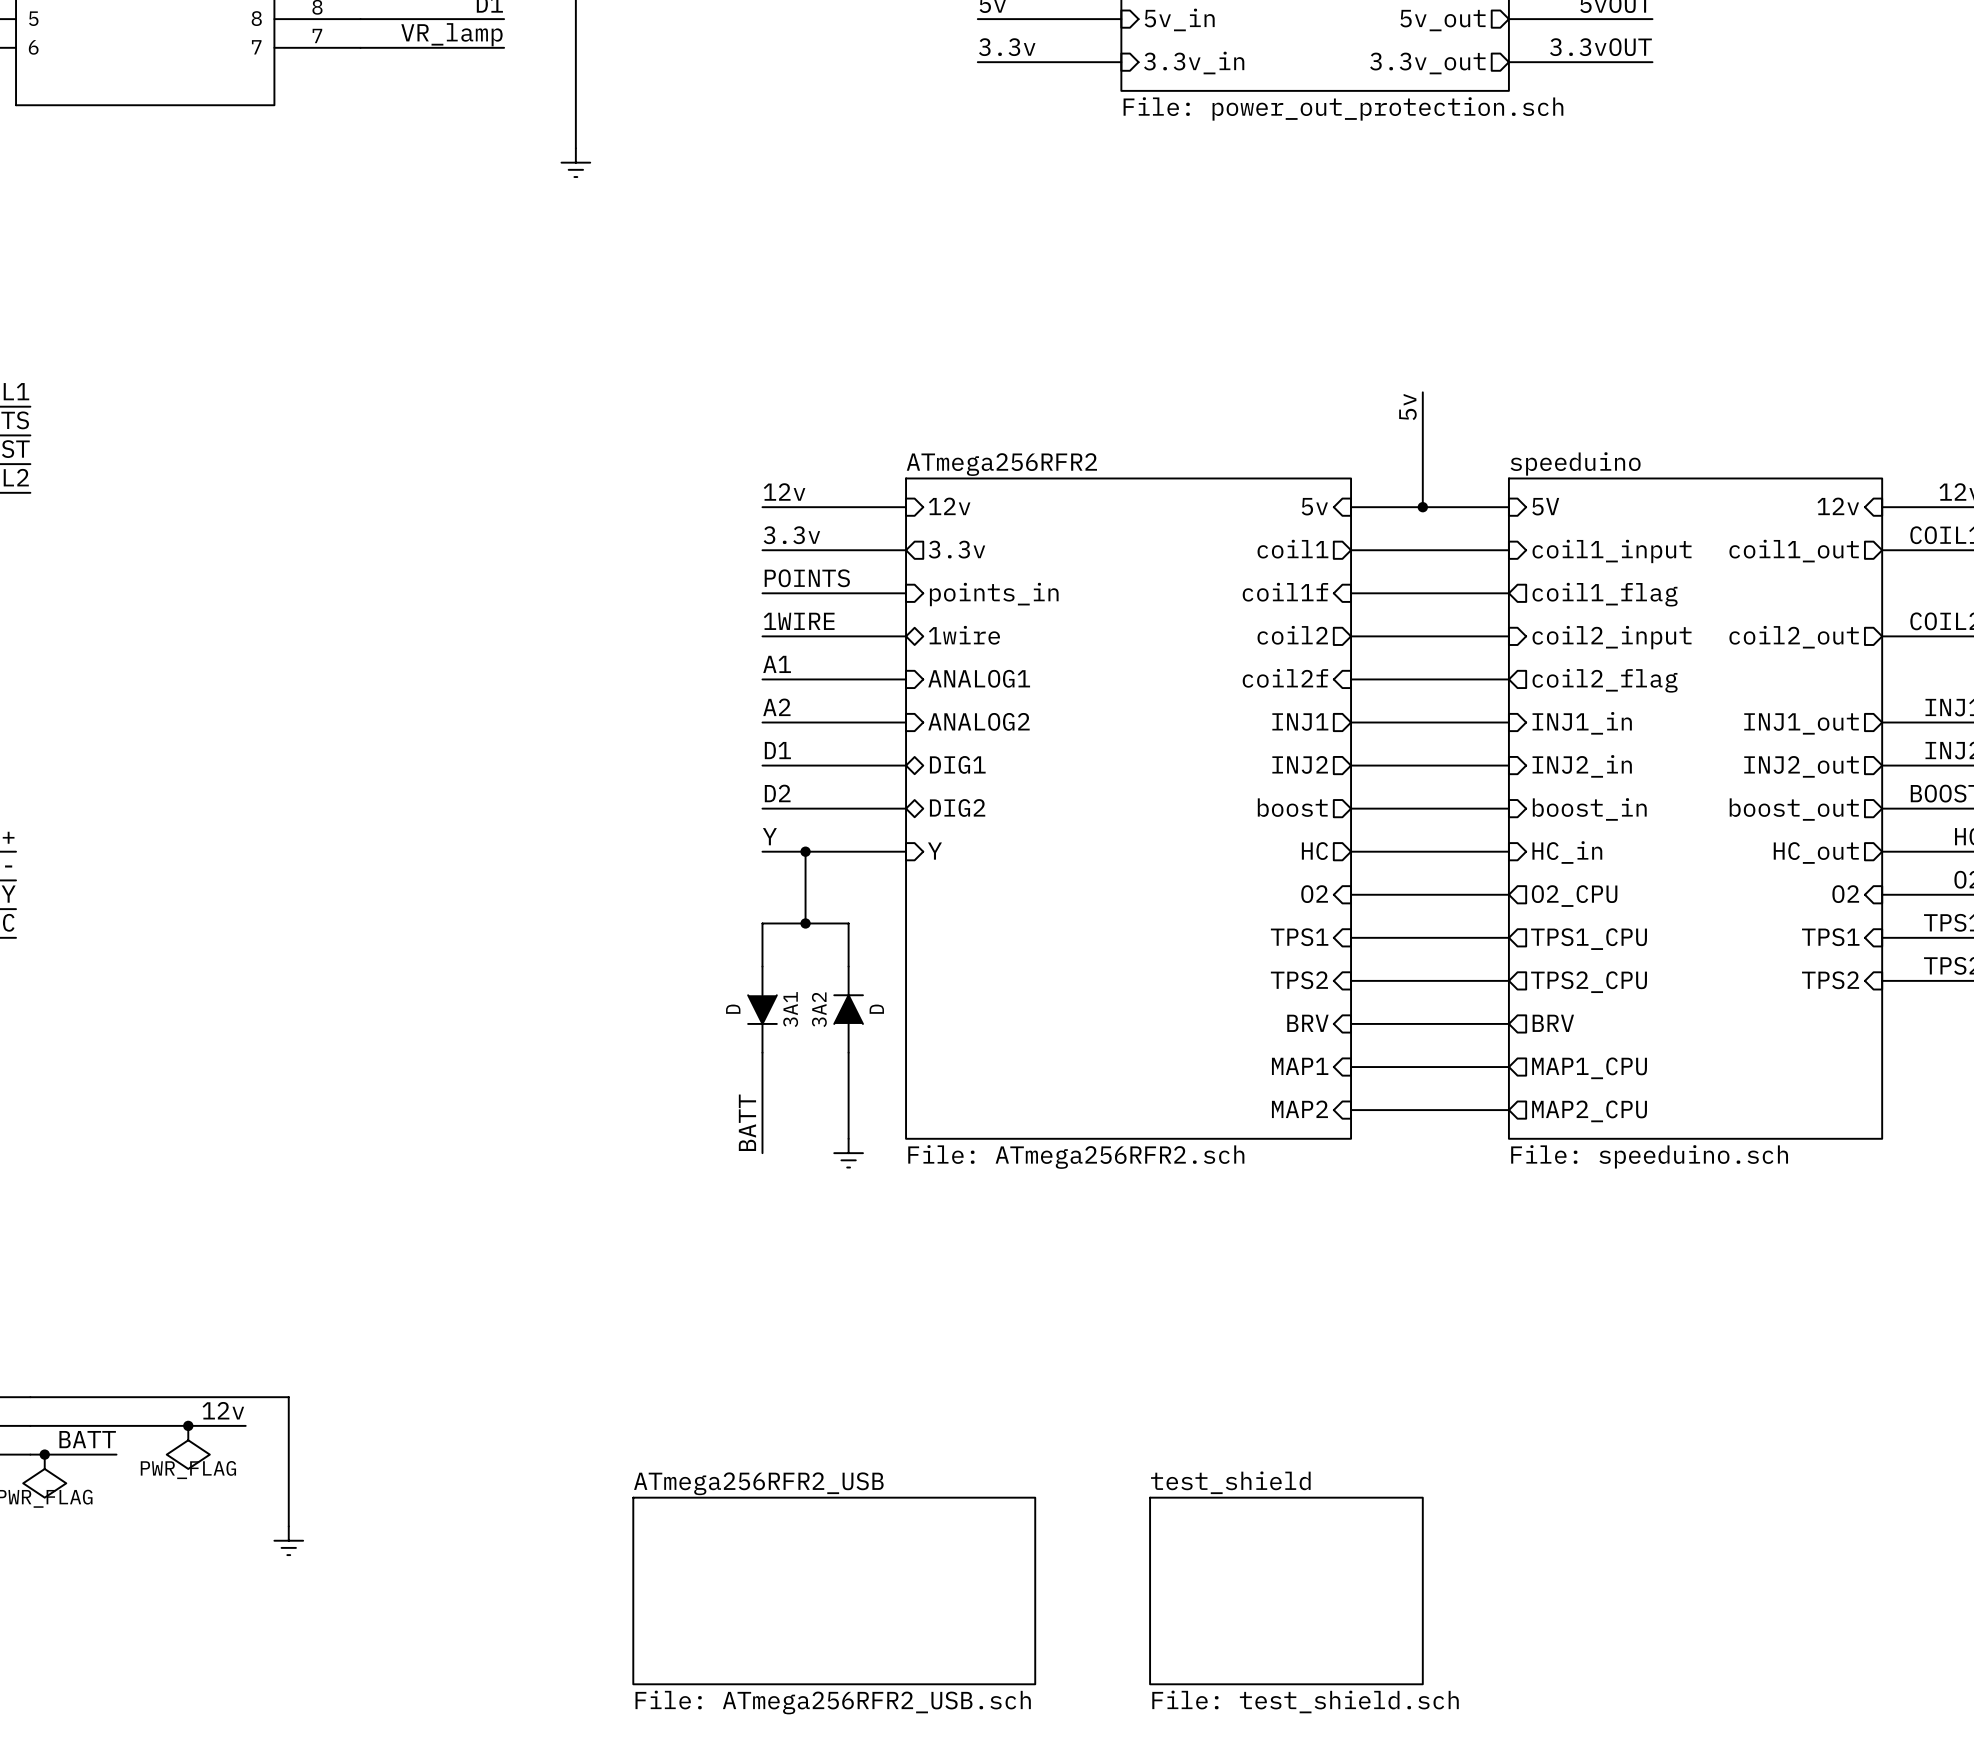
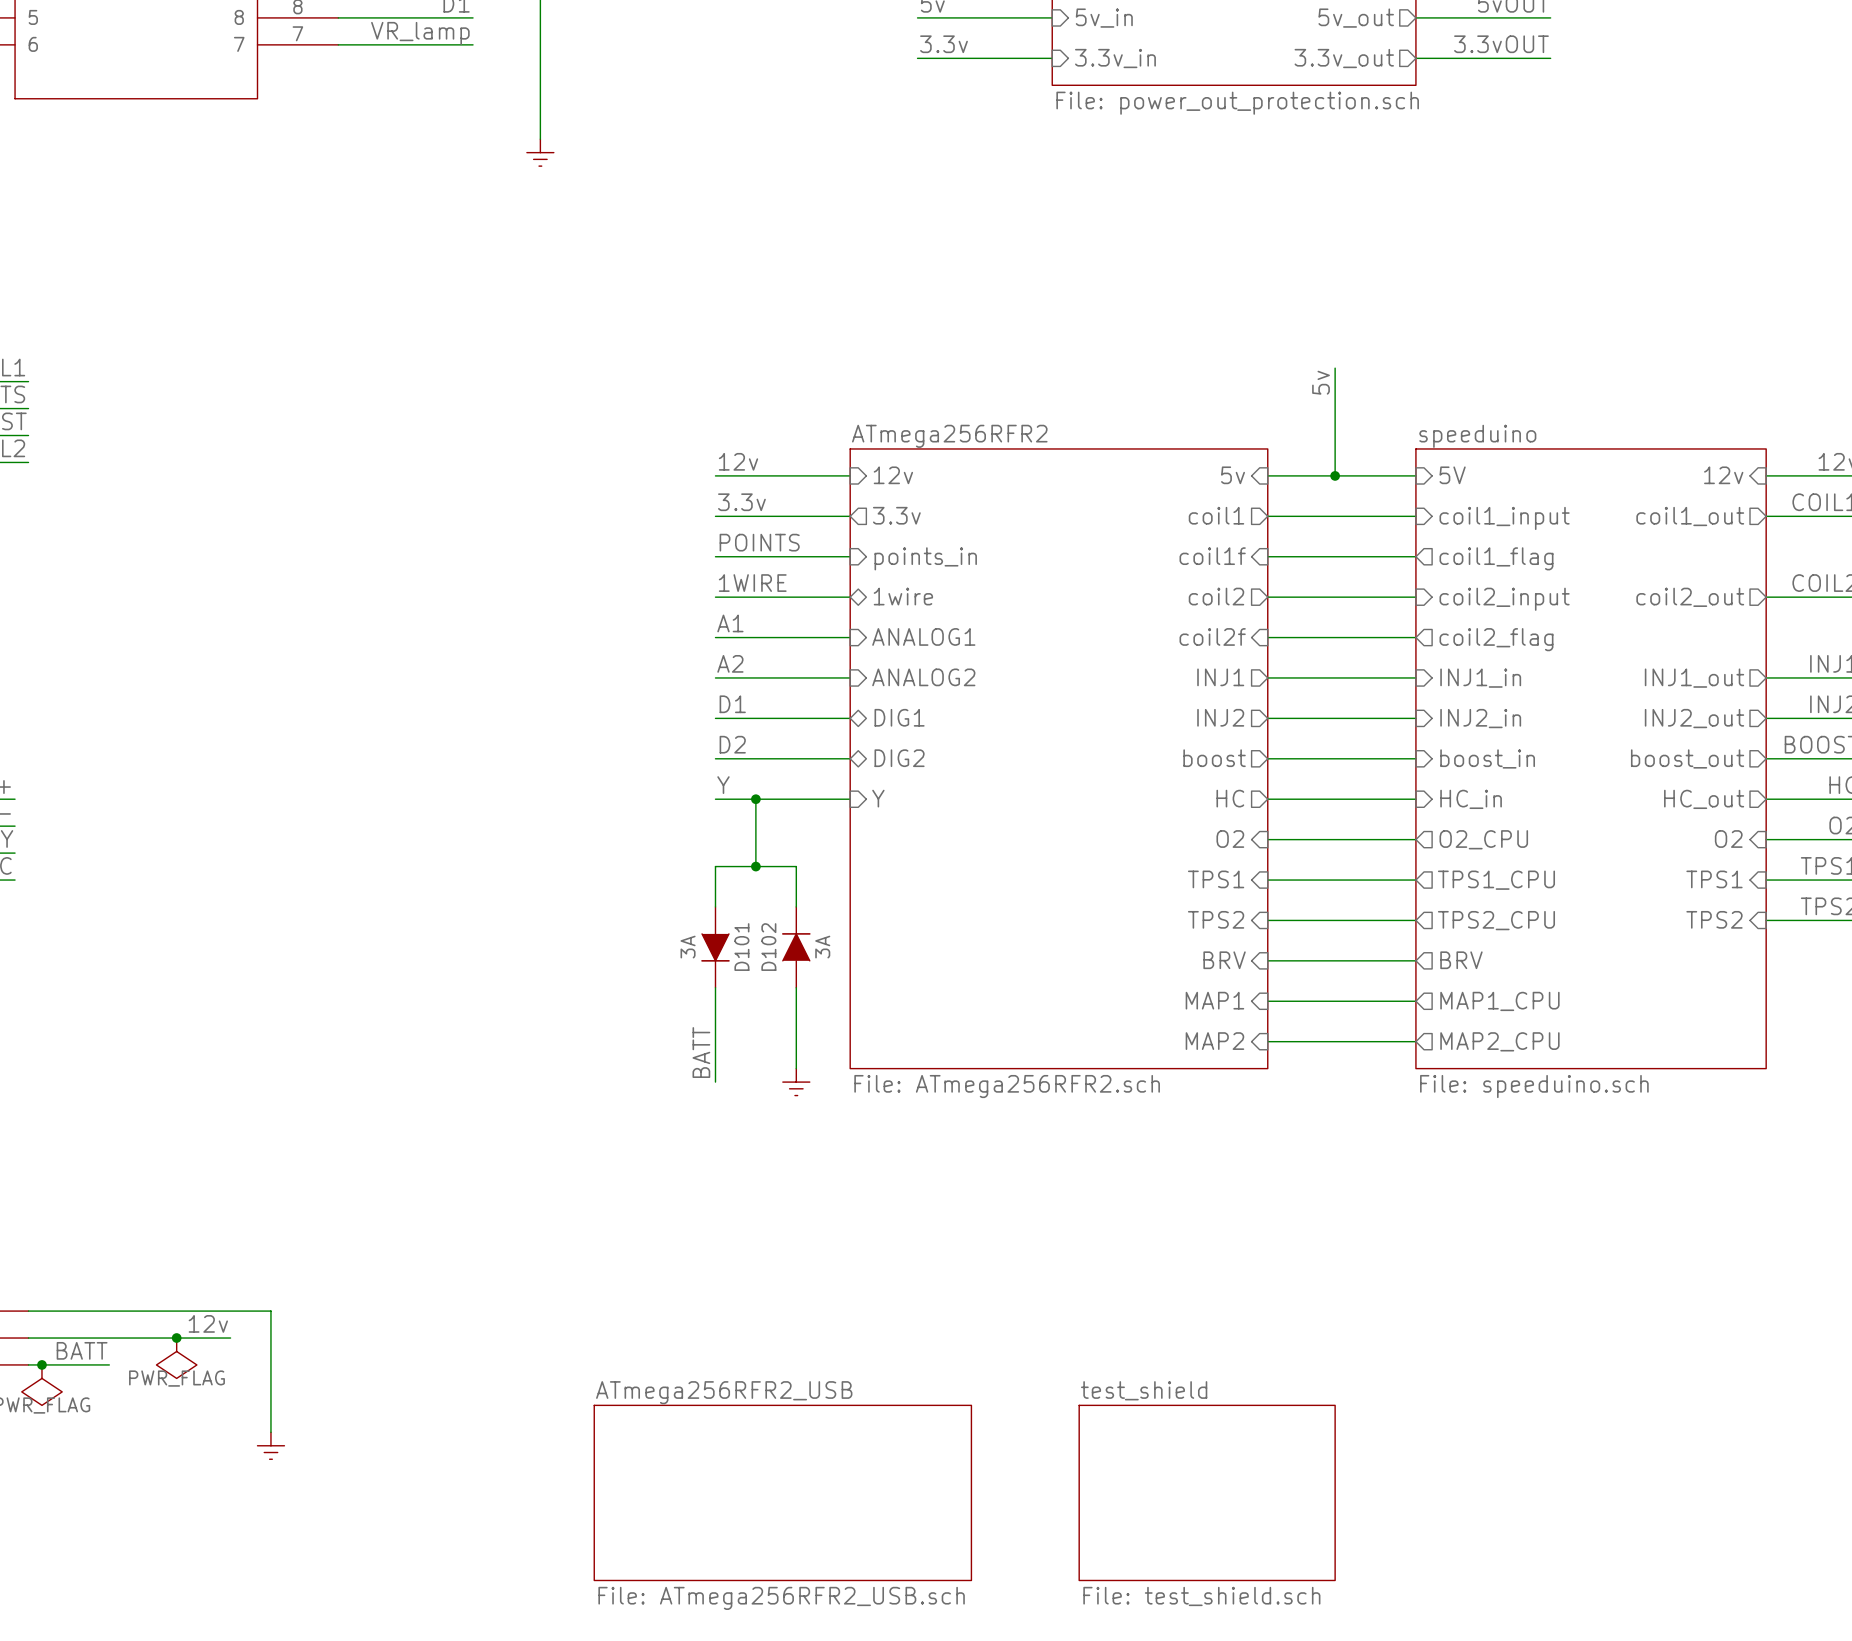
3A1 value: D (733, 1009) -> 3A (688, 947)
3A1 name: 3A1 (790, 1009) -> D101 (741, 947)
3A2 name: 3A2 (819, 1009) -> D102 (768, 947)
3A2 value: D (876, 1009) -> 3A (822, 947)

